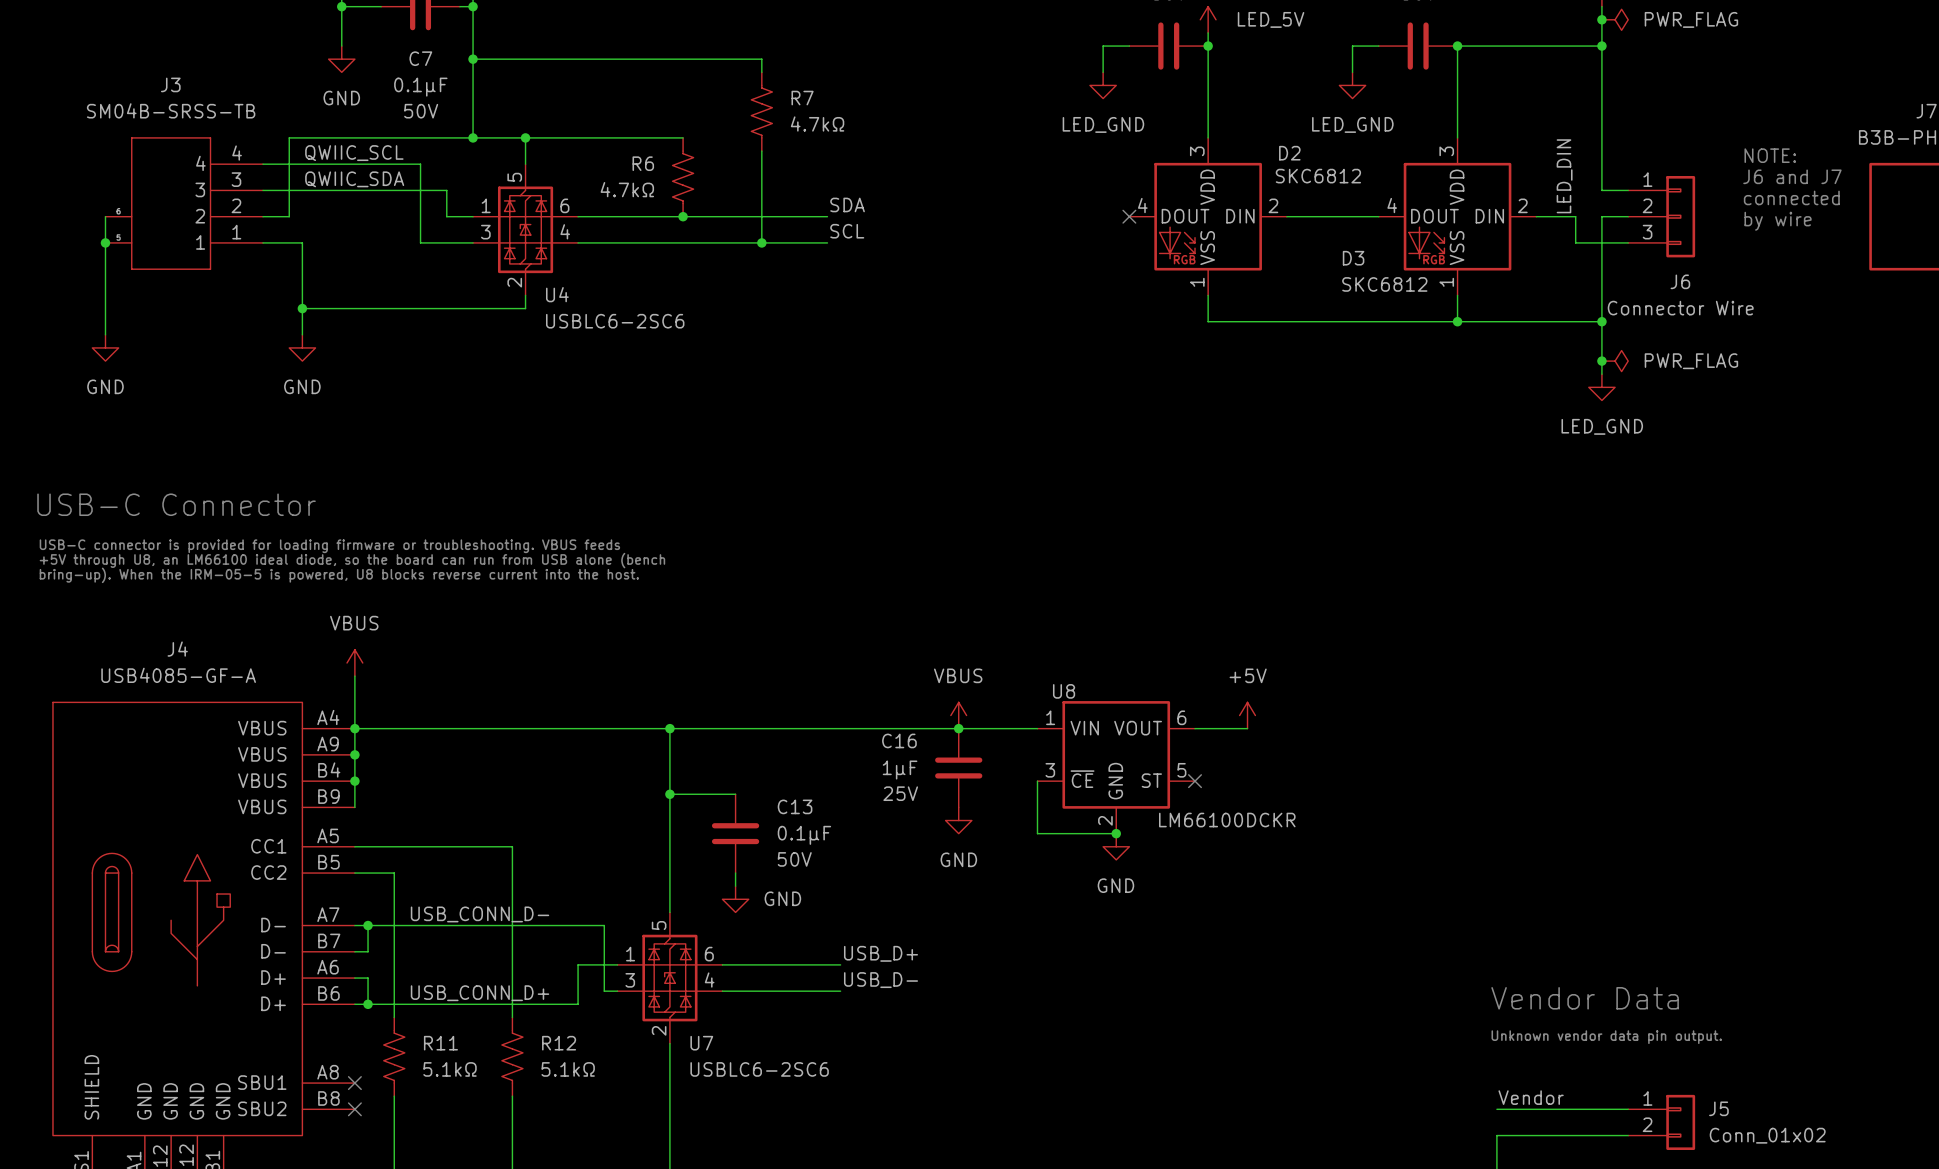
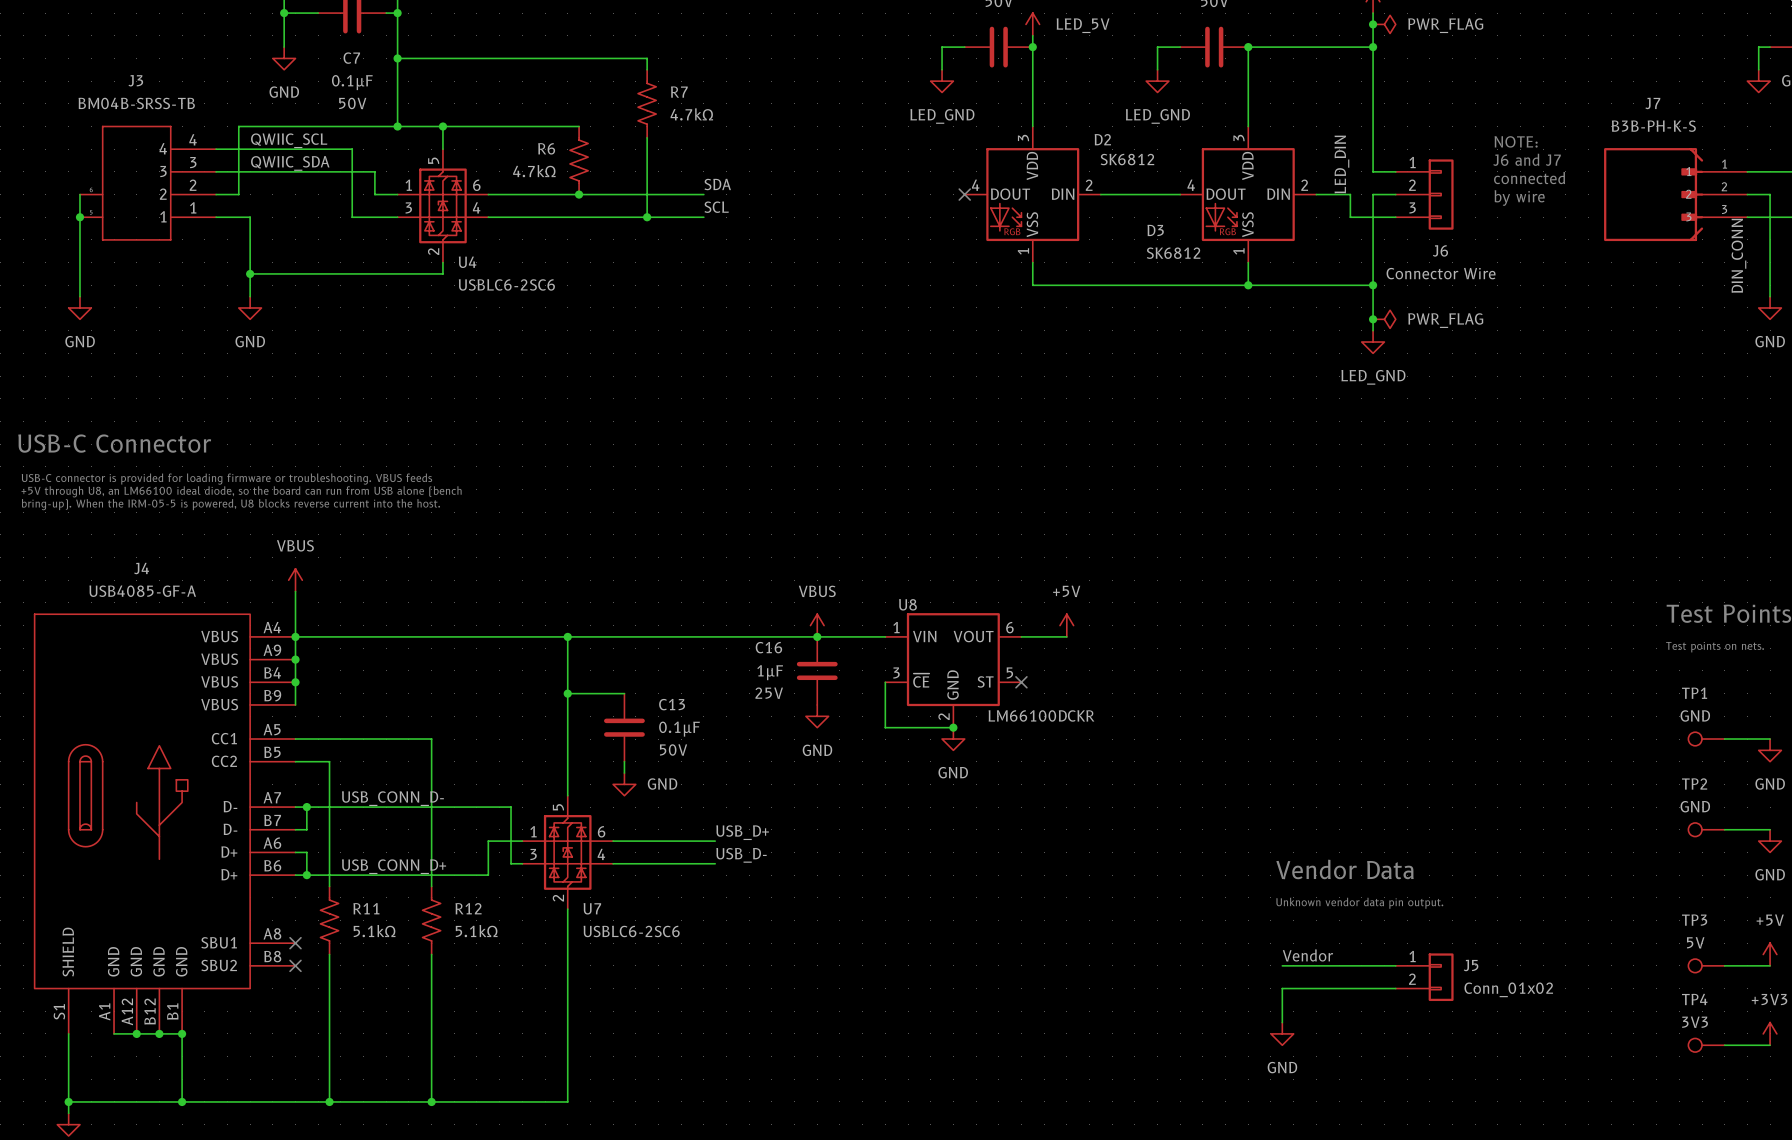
J3 value: SM04B-SRSS-TB (171, 110) -> BM04B-SRSS-TB (136, 103)
D2 value: SKC6812 (1318, 176) -> SK6812 (1127, 159)
D3 value: SKC6812 (1384, 284) -> SK6812 (1173, 253)

